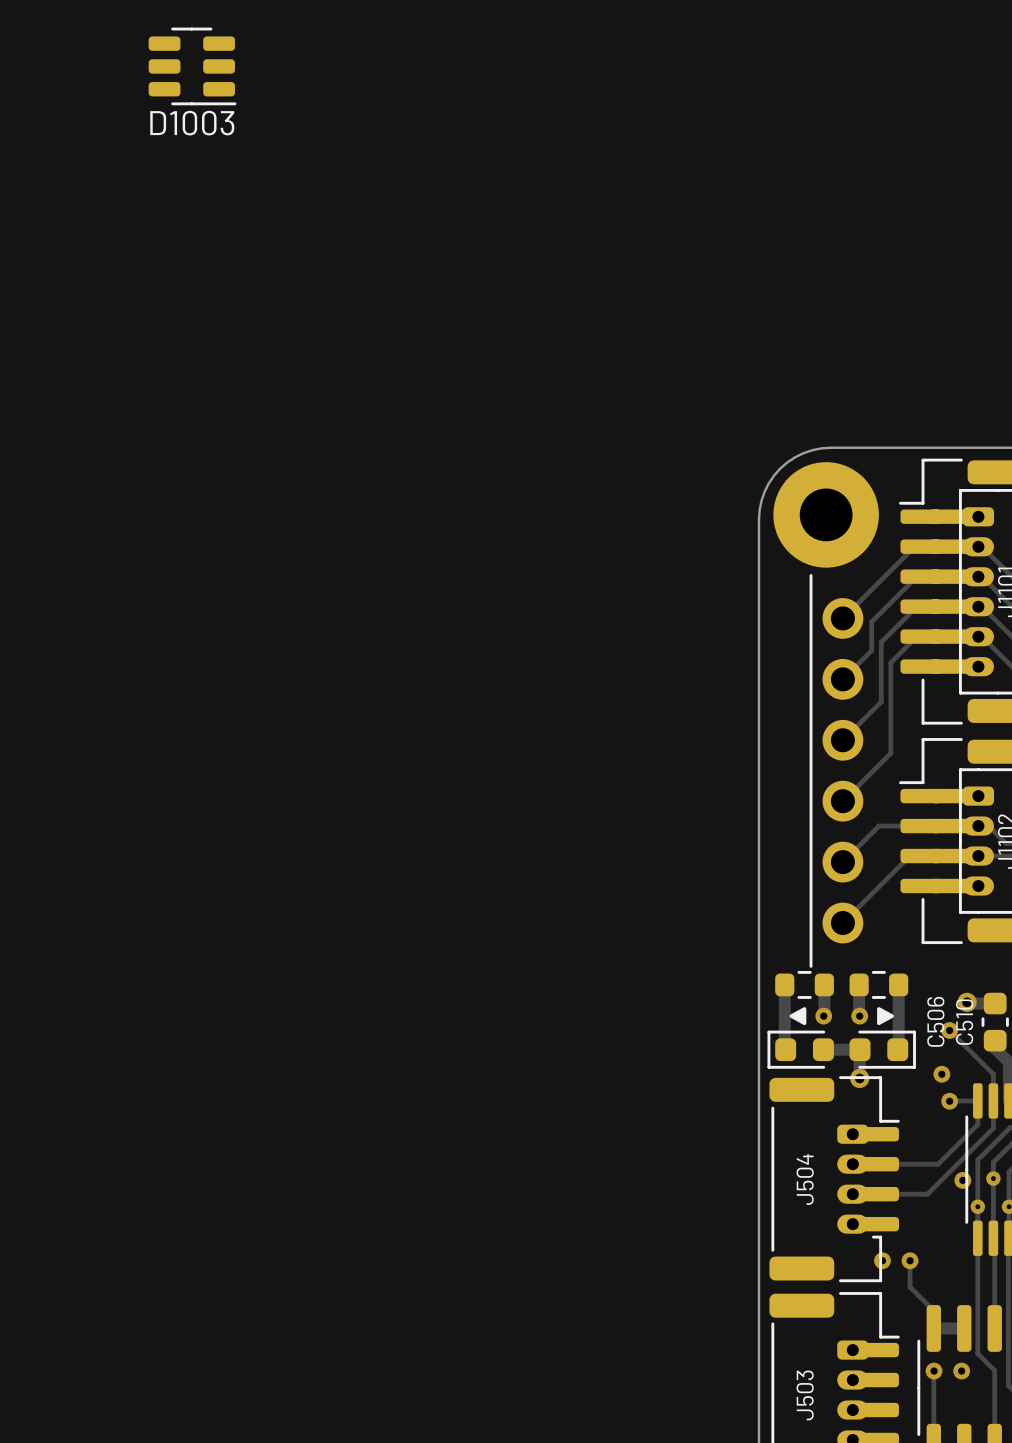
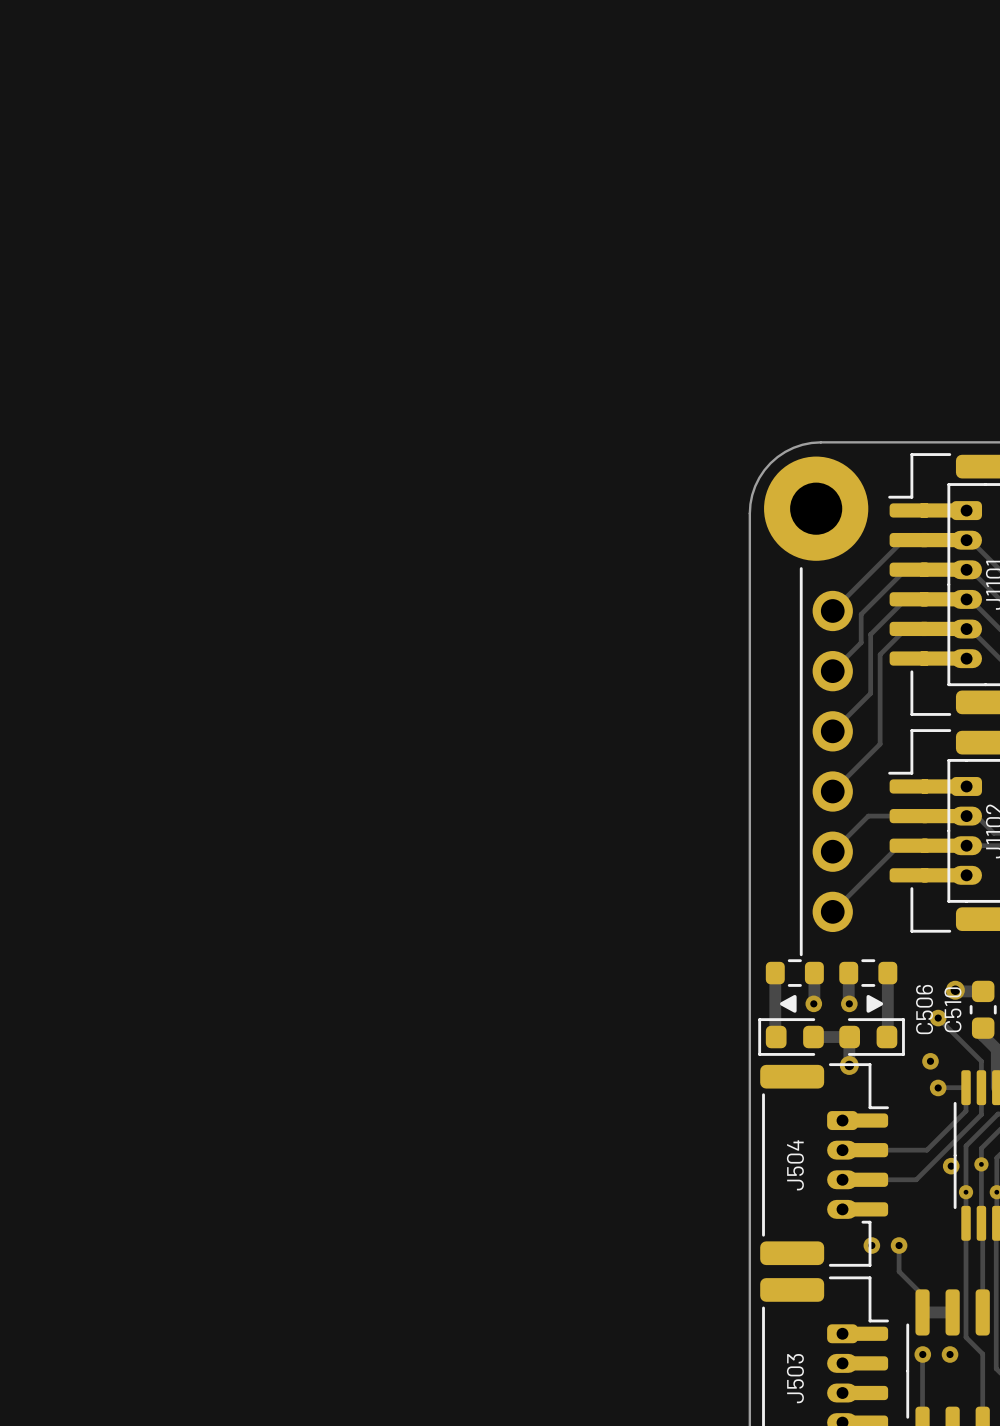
D1003: (192, 66) -> none

